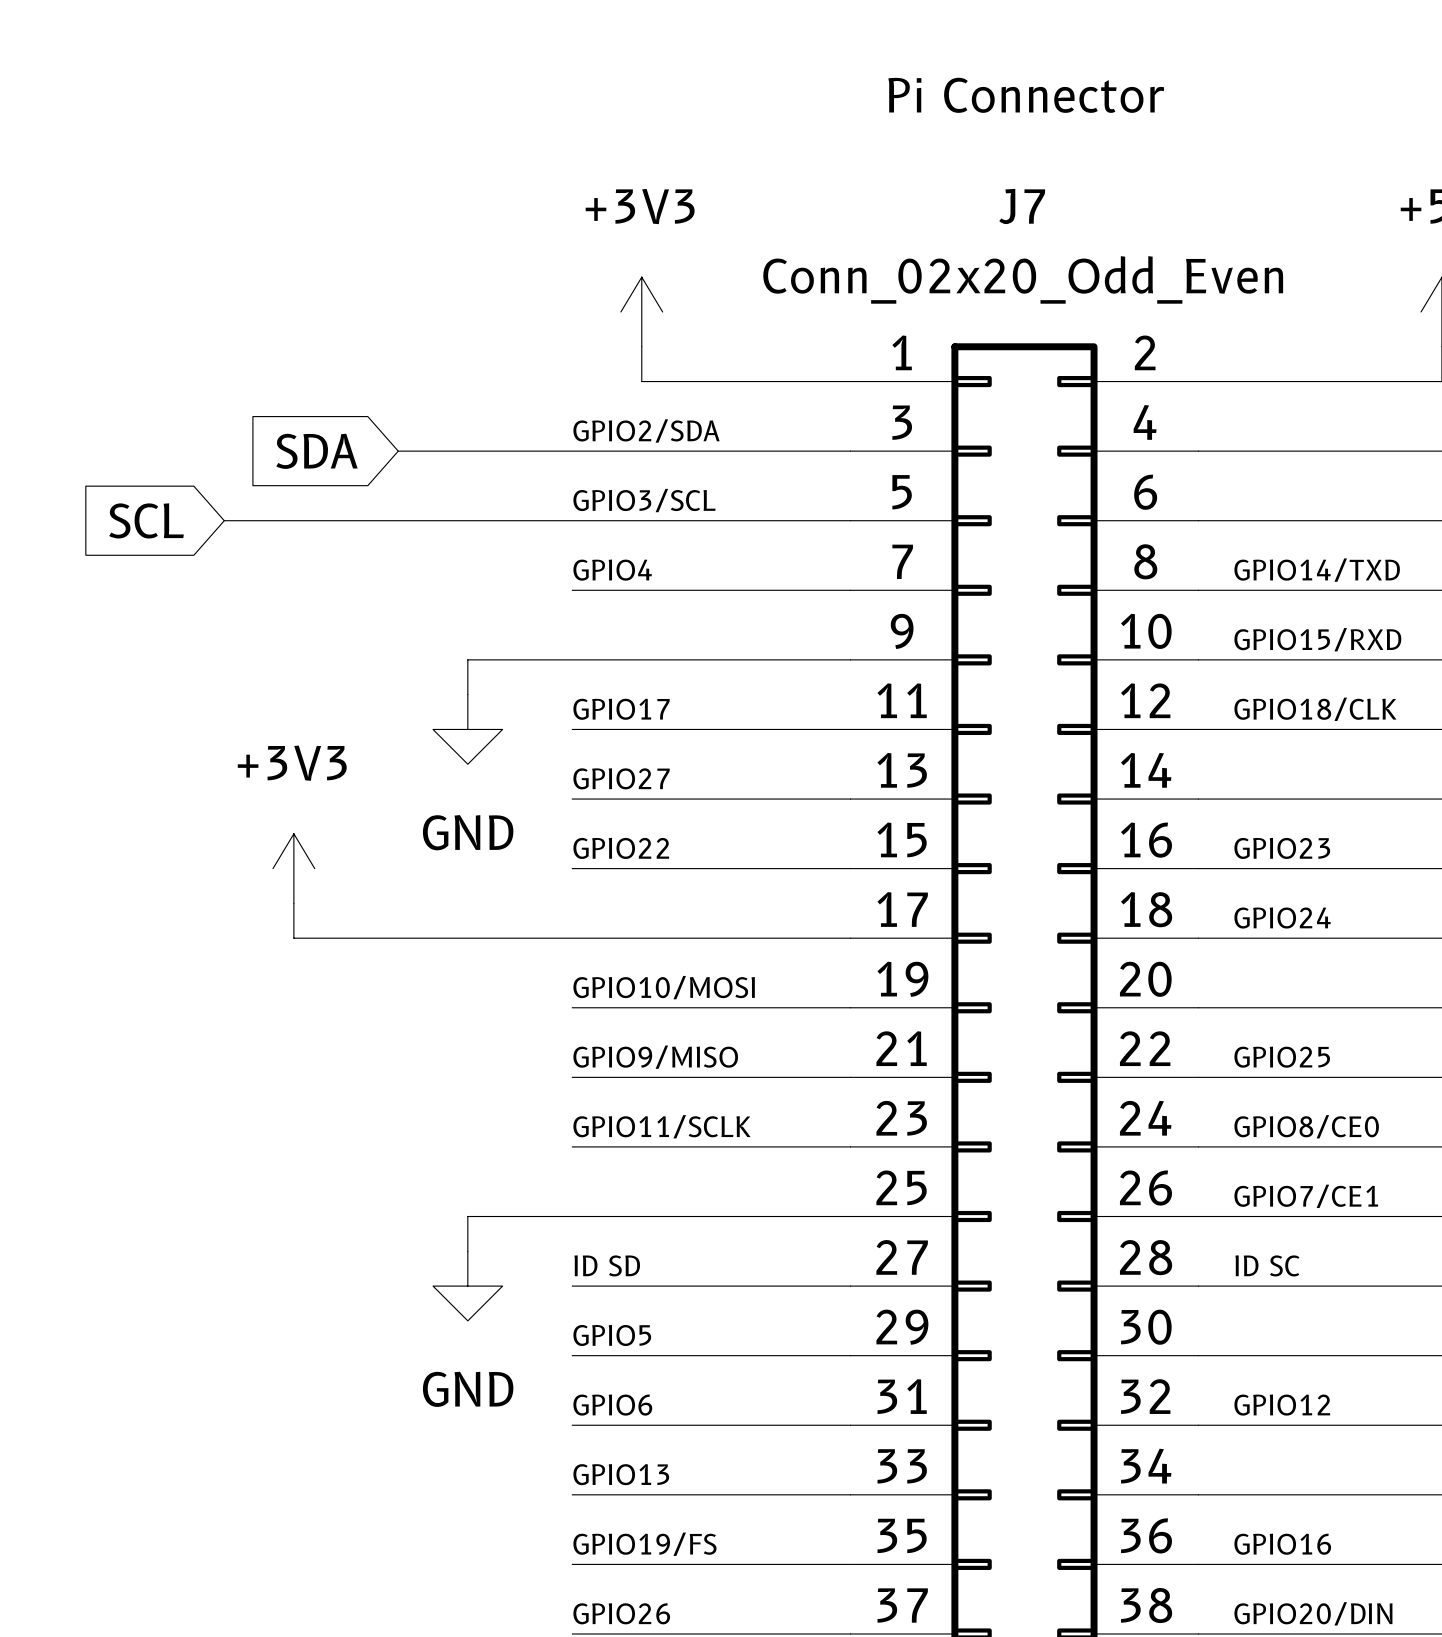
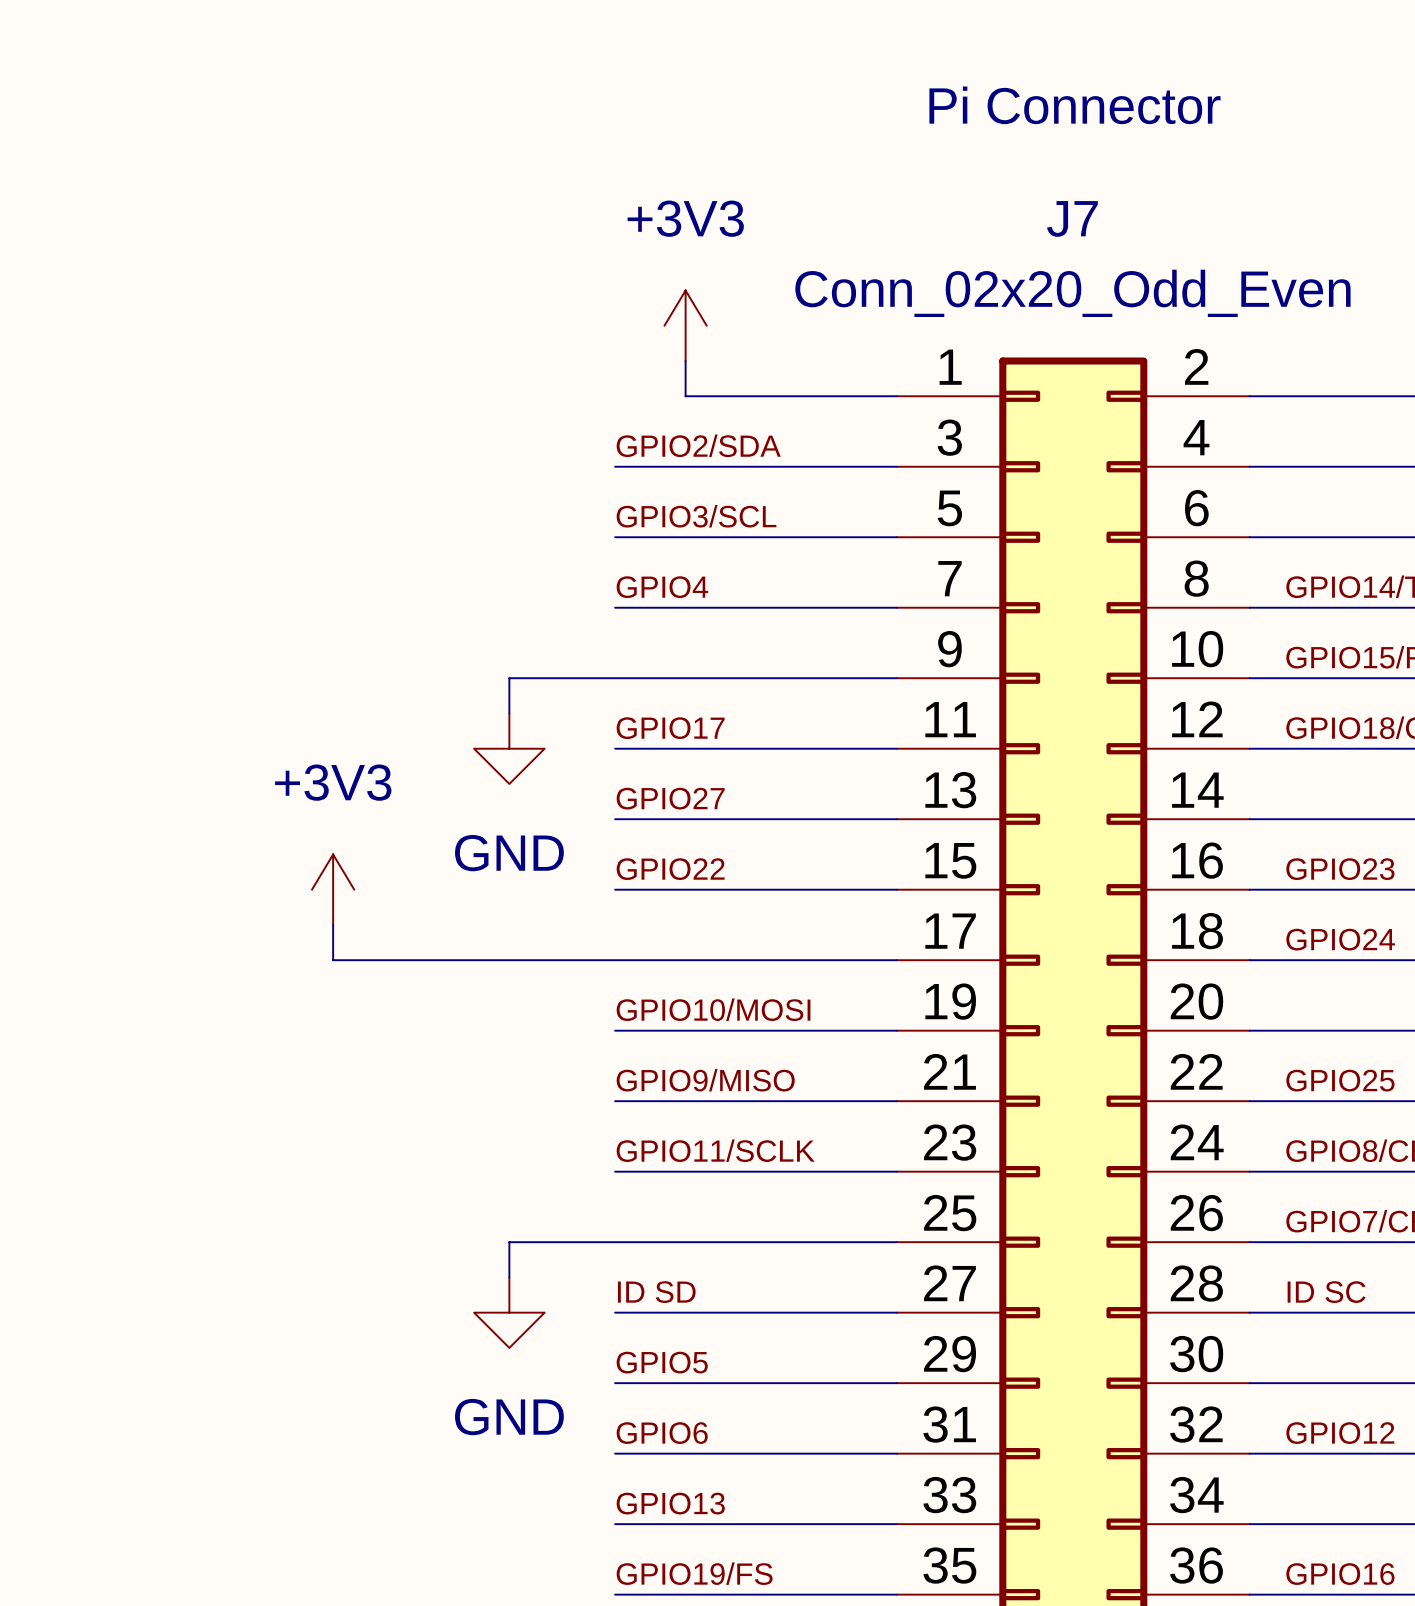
global label: SDA (316, 451) -> none
wire: (398, 451) (572, 451) -> none
global label: SCL (146, 520) -> none
wire: (224, 520) (572, 520) -> none

